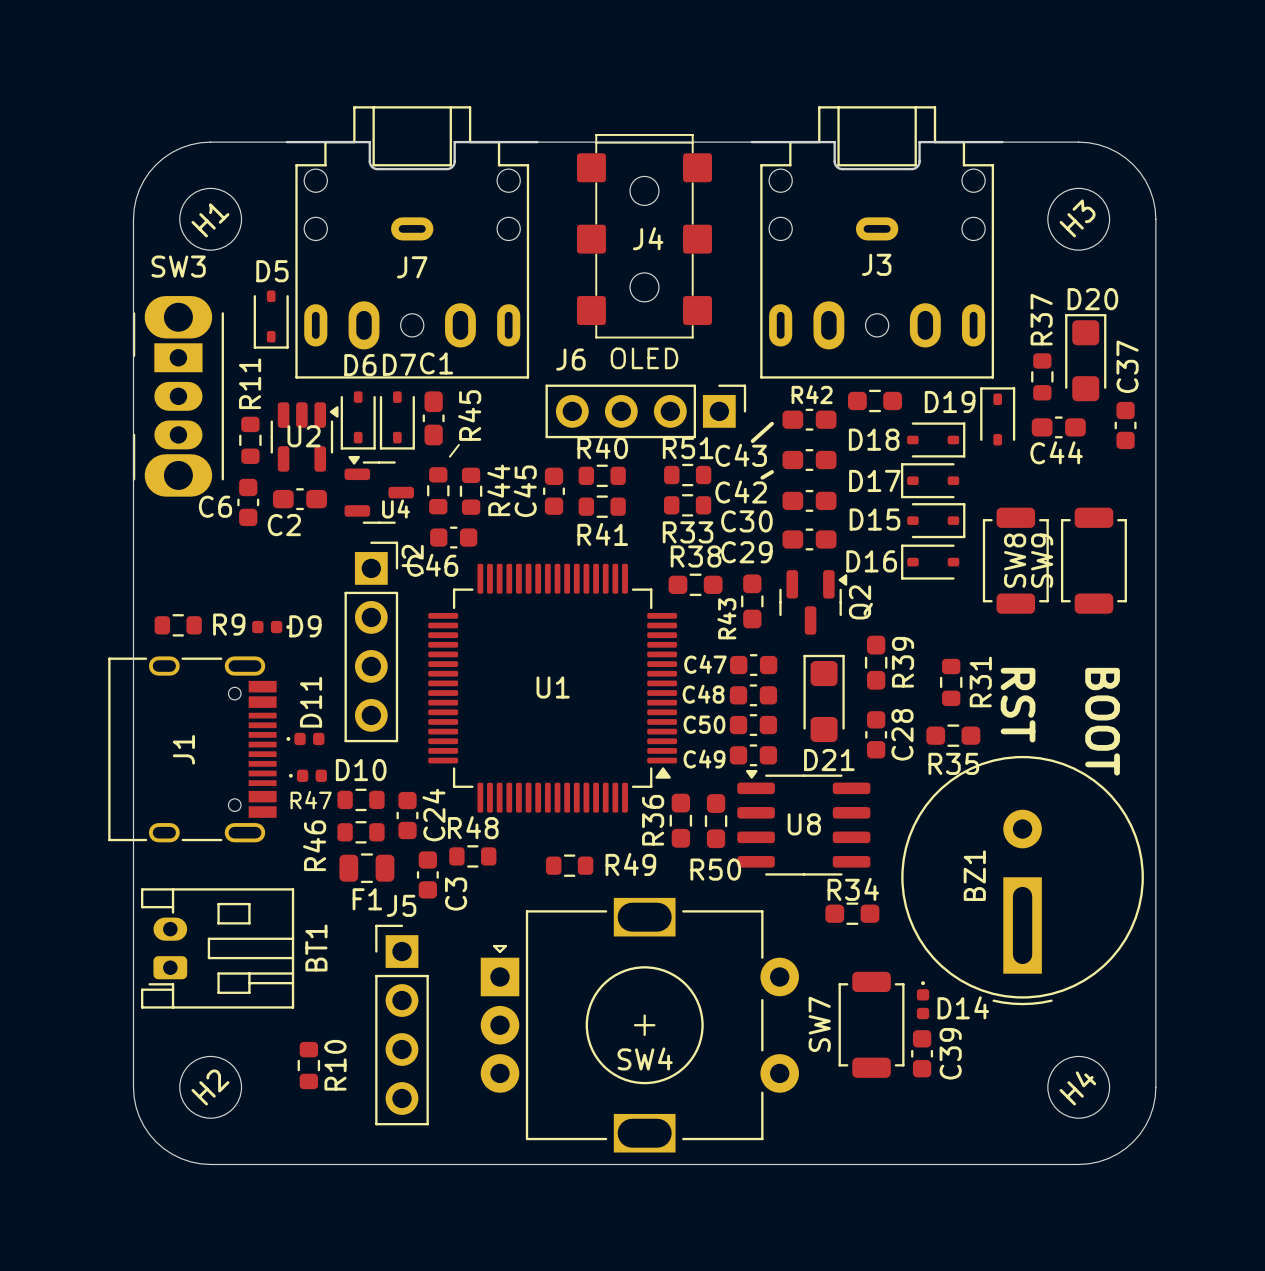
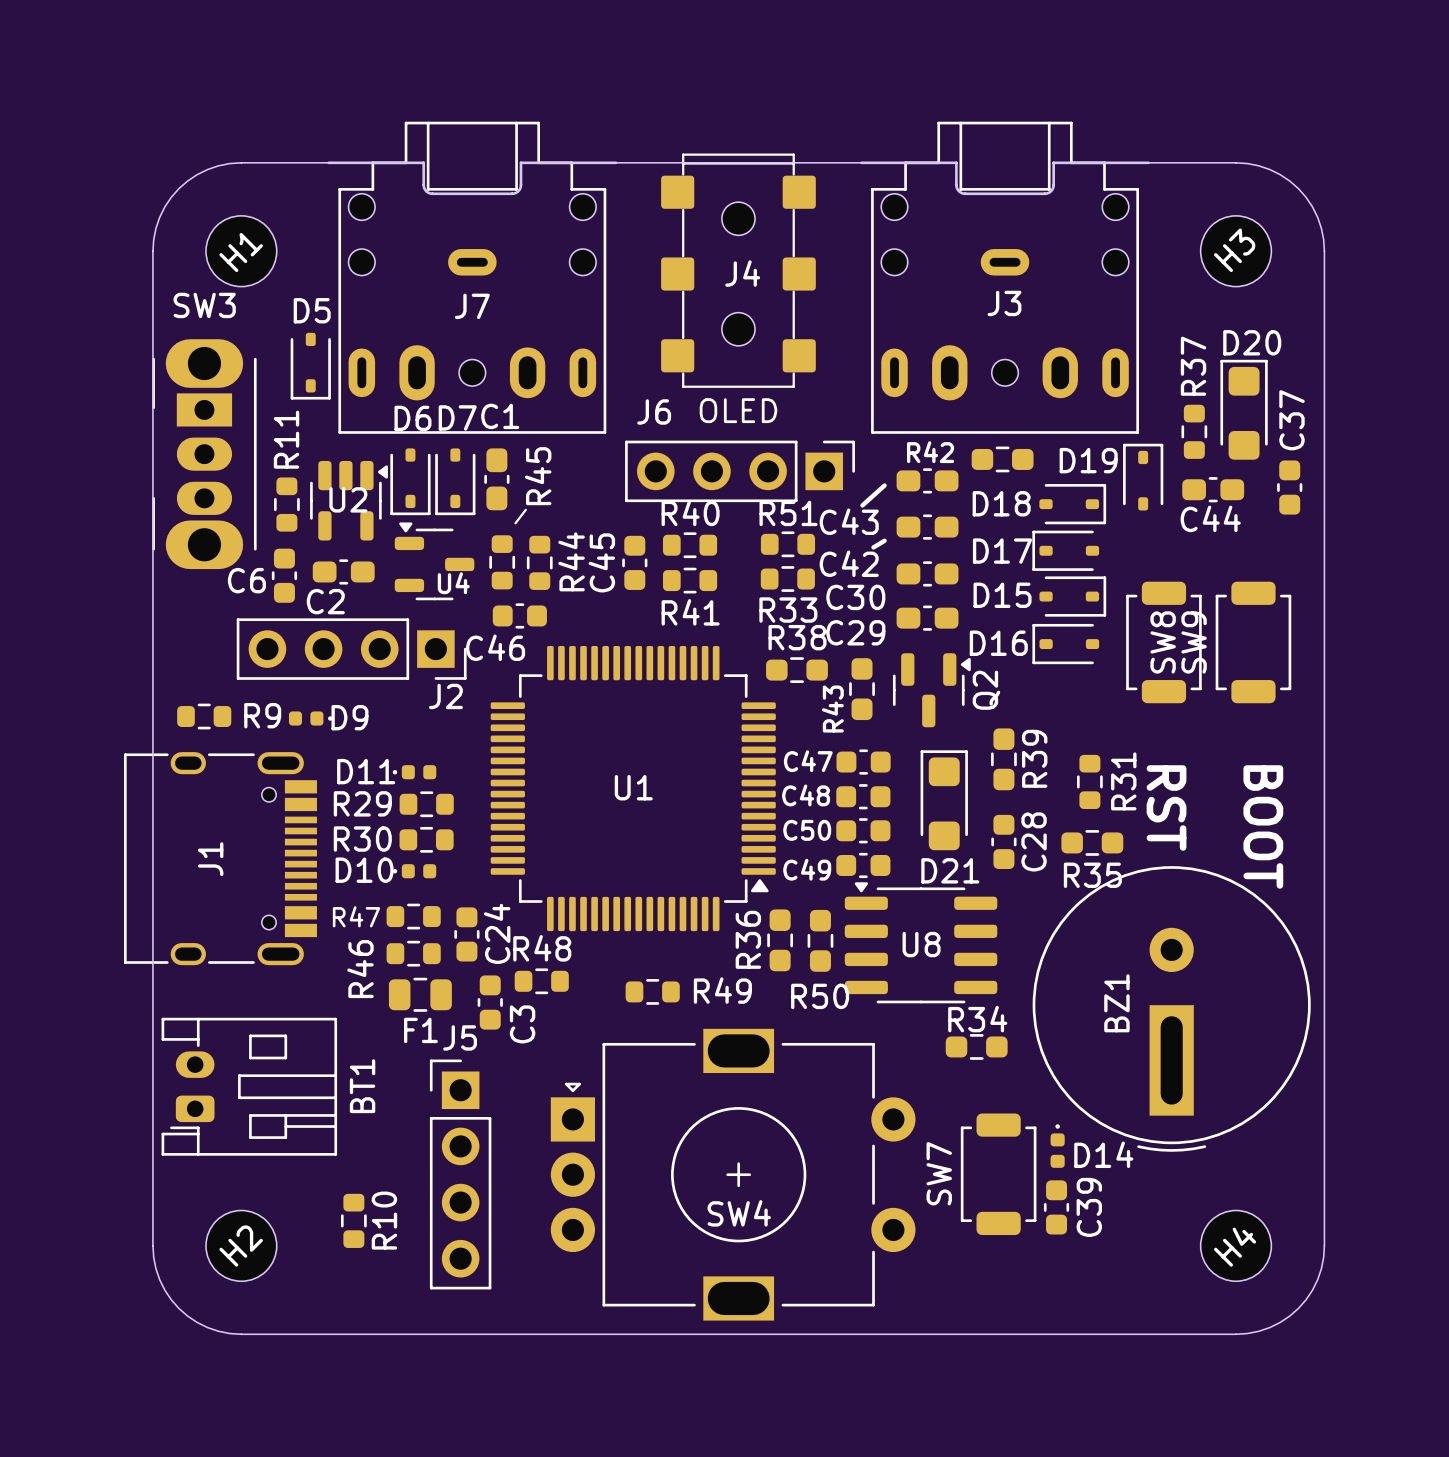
J2 rotation: 0° (371, 641) -> 90° clockwise (351, 649)
R29: none -> (426, 804)
D11 name rotation: 0° (311, 702) -> 90° clockwise (366, 771)
R30: none -> (426, 839)
D11 position: (305, 738) -> (414, 772)
D10 name position: D10 (361, 770) -> D10 (364, 870)
D10 position: (307, 775) -> (414, 871)

